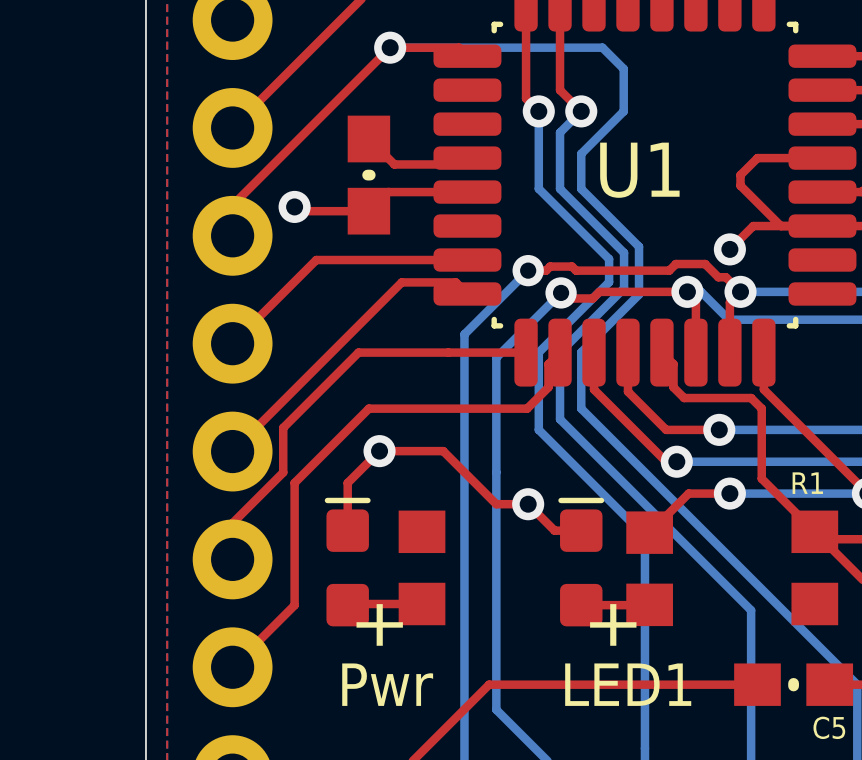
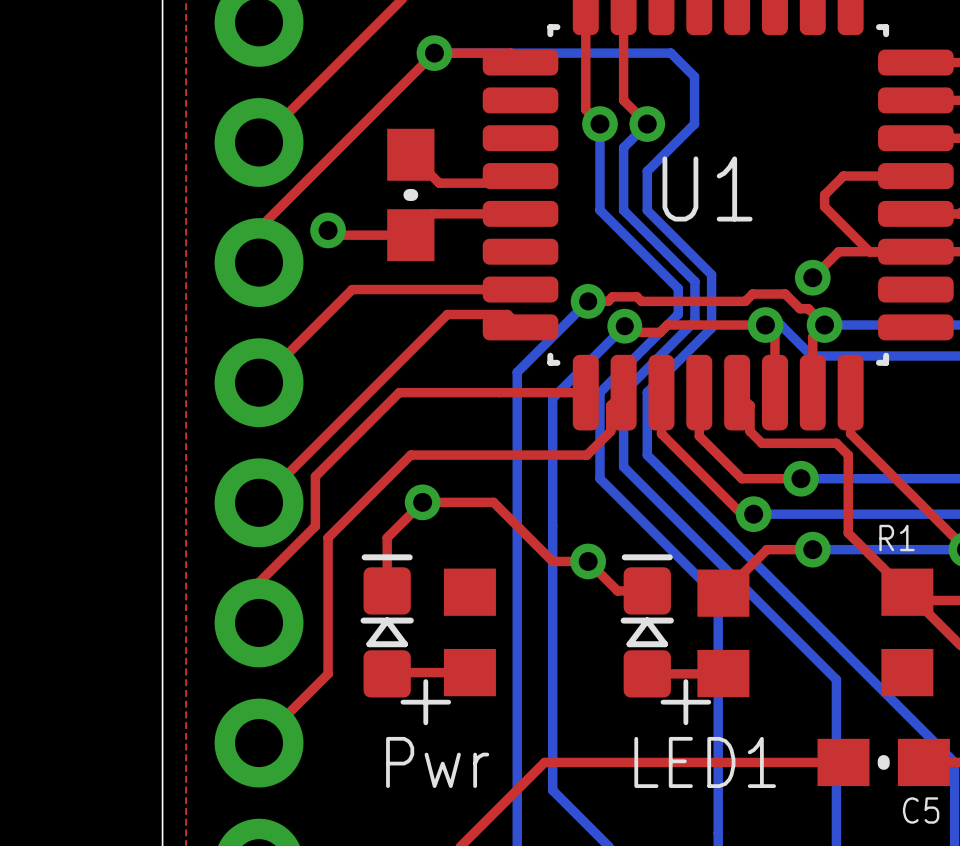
part footprint: [324, 497, 371, 627] -> [360, 554, 414, 698]
part footprint: [558, 497, 605, 627] -> [620, 554, 674, 698]

